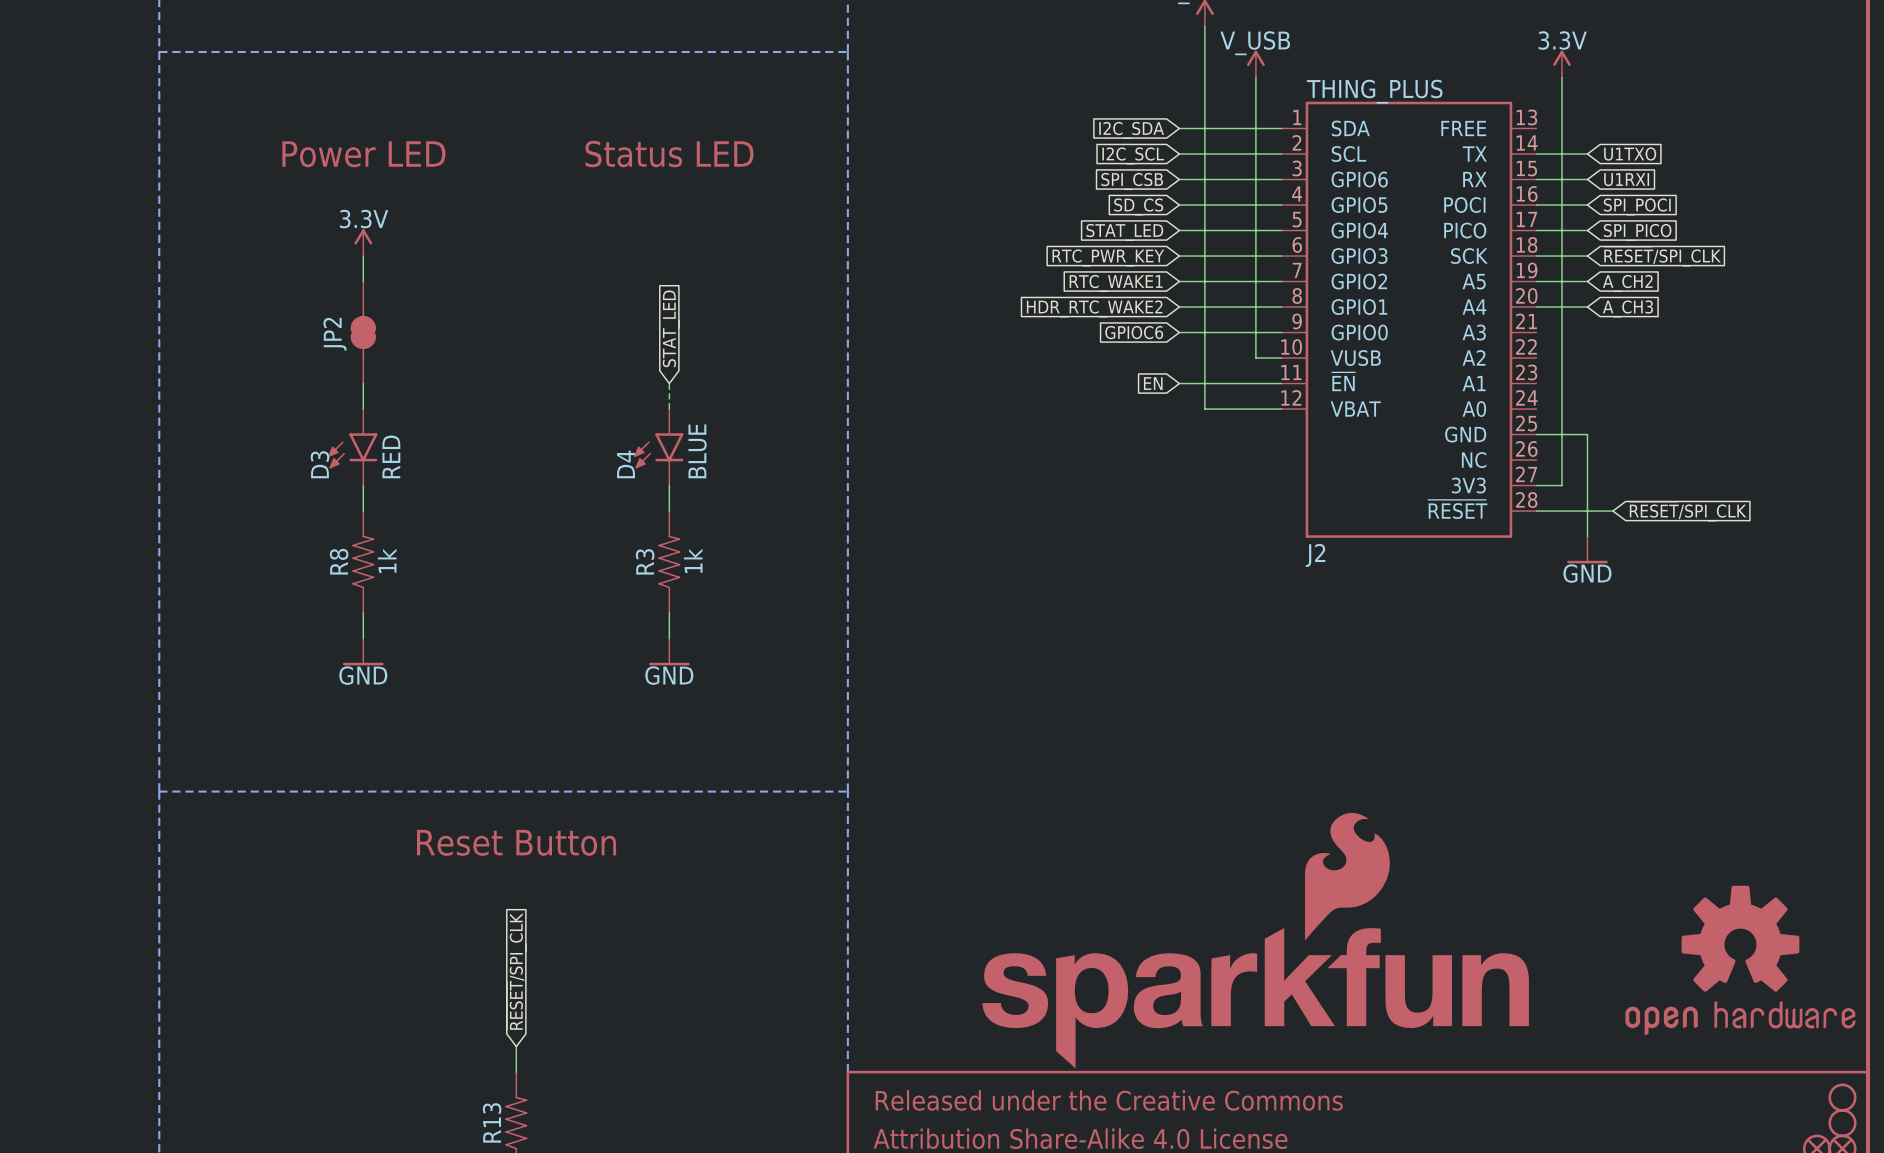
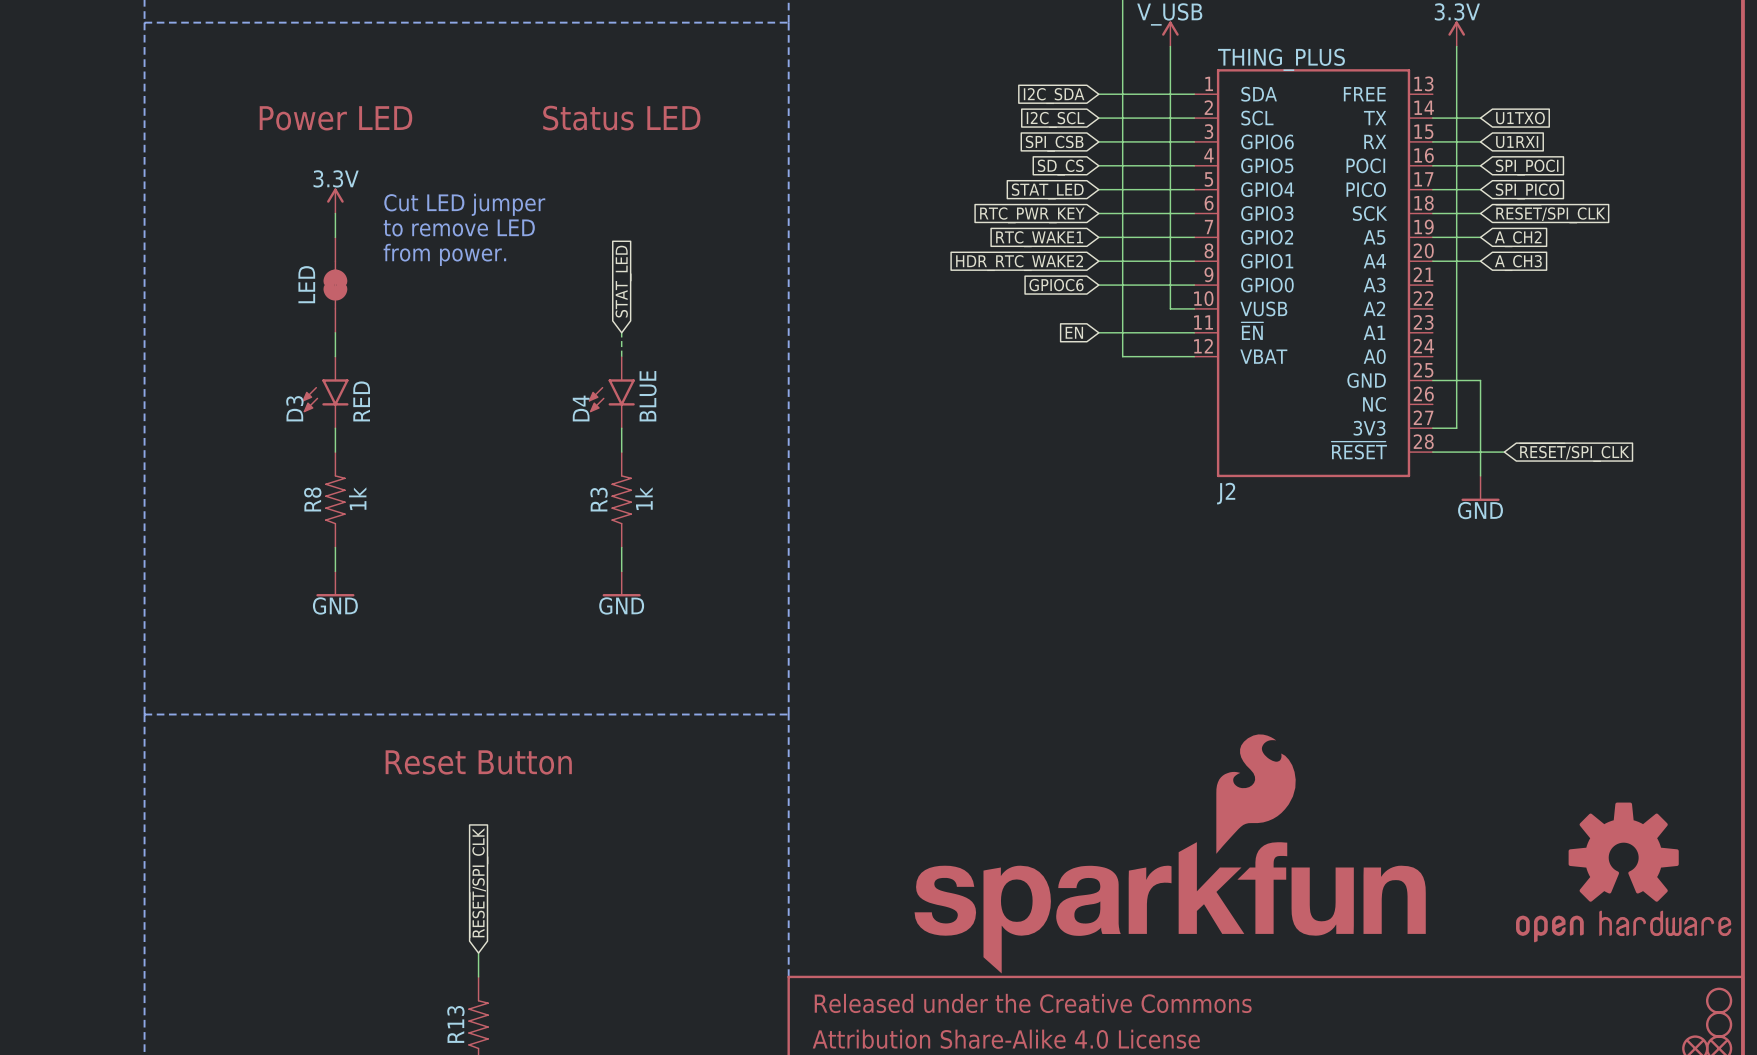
text: none -> Cut LED jumper (464, 204)
text: none -> to remove LED (459, 227)
text: none -> from power. (444, 254)
JP2 name: JP2 (335, 334) -> LED (306, 284)

